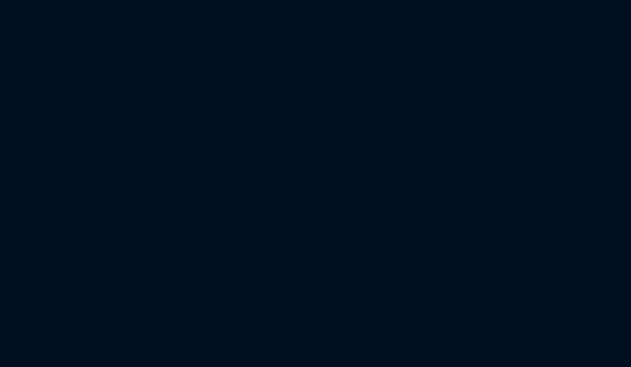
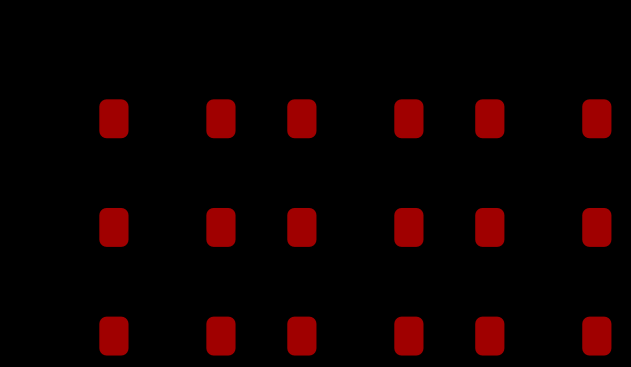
part: none -> (167, 118)
part: none -> (355, 118)
part: none -> (543, 118)
part: none -> (167, 227)
part: none -> (355, 227)
part: none -> (543, 227)
part: none -> (167, 336)
part: none -> (355, 336)
part: none -> (543, 336)

